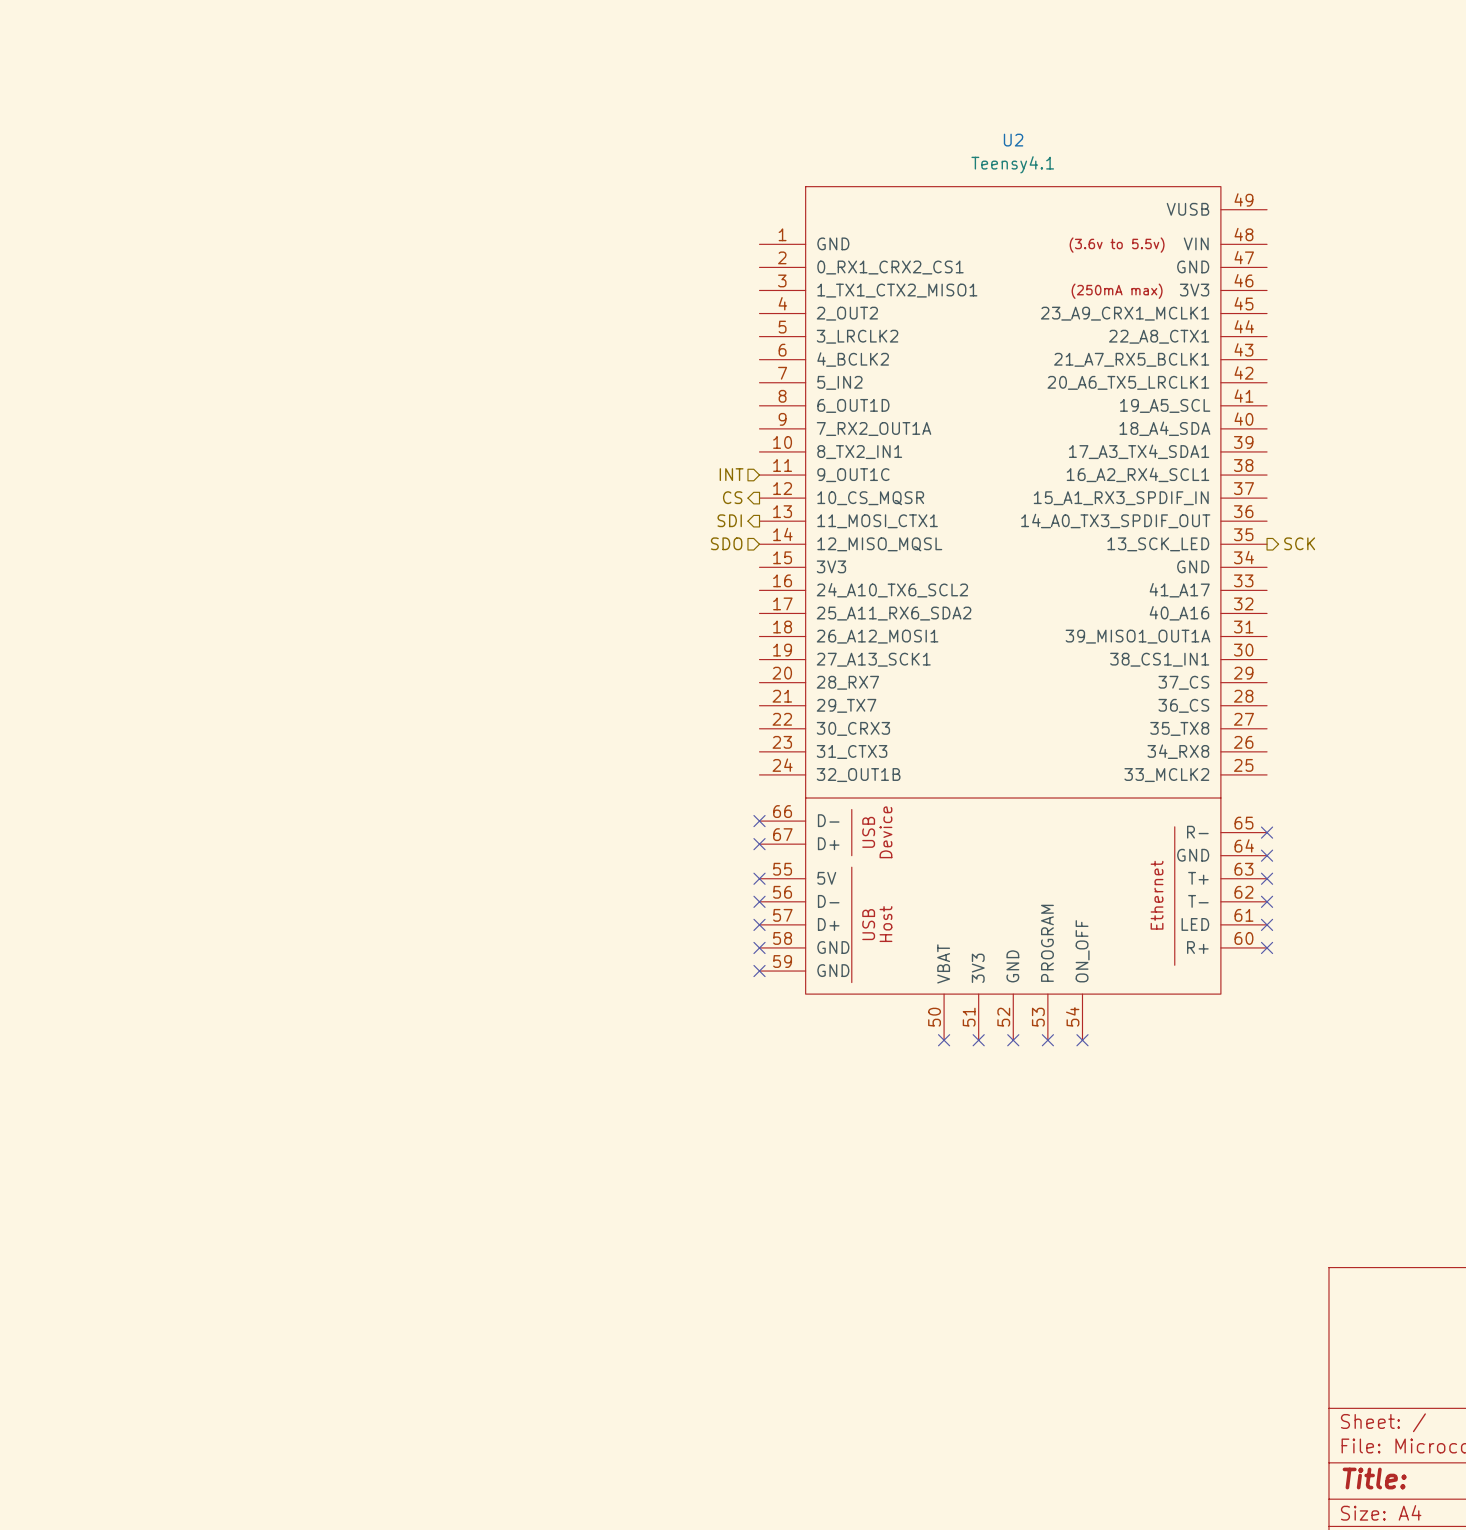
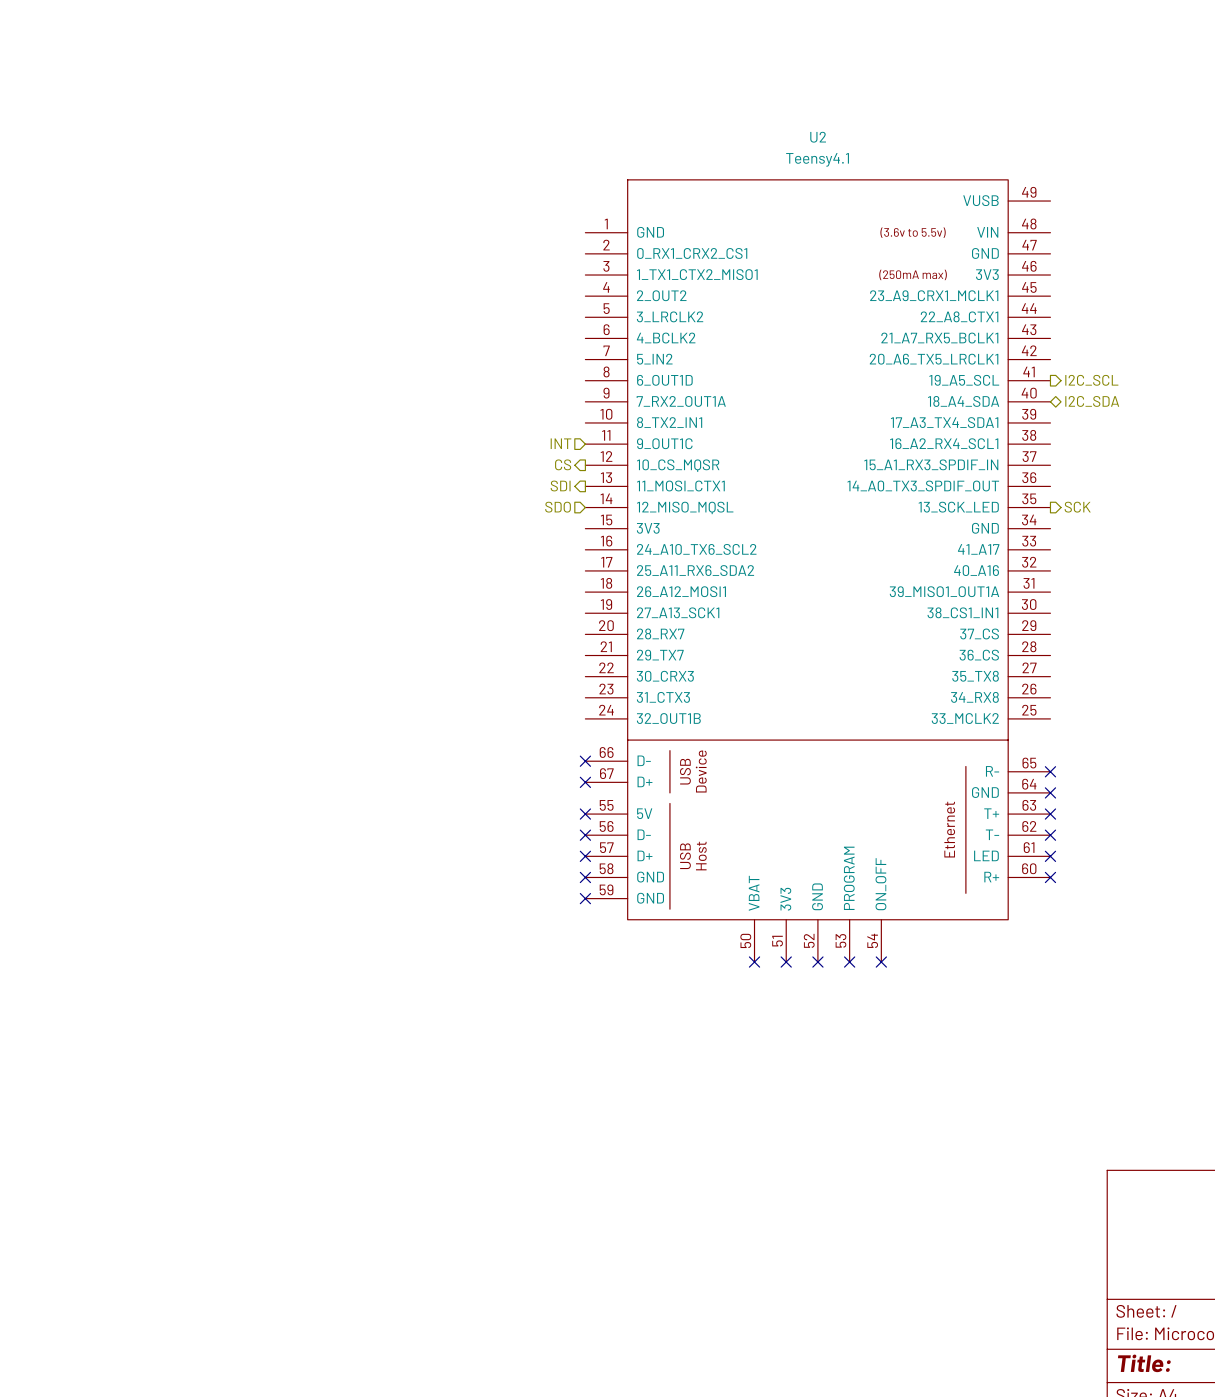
hierarchical label: none -> I2C_SCL (1091, 380)
hierarchical label: none -> I2C_SDA (1092, 401)

